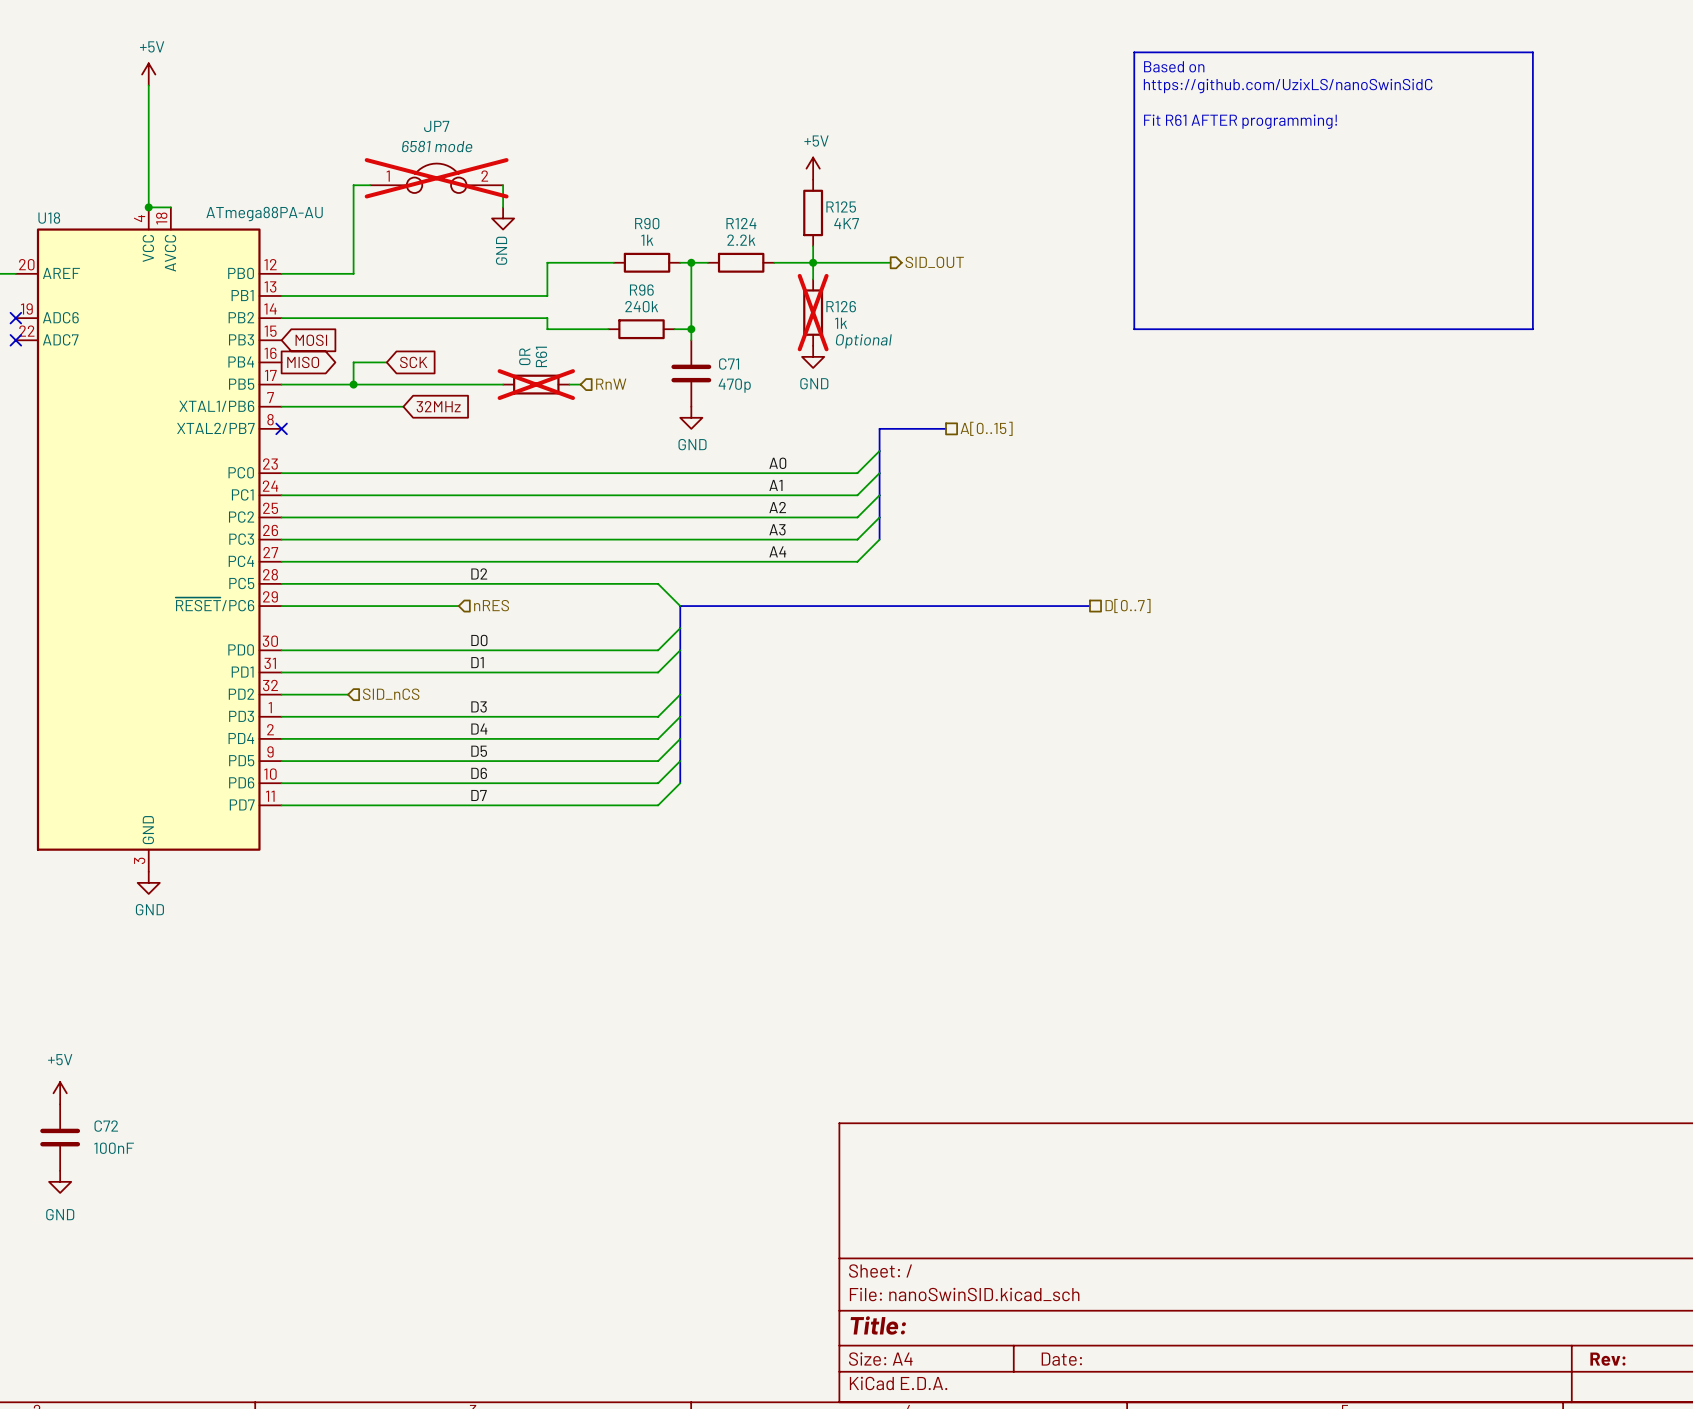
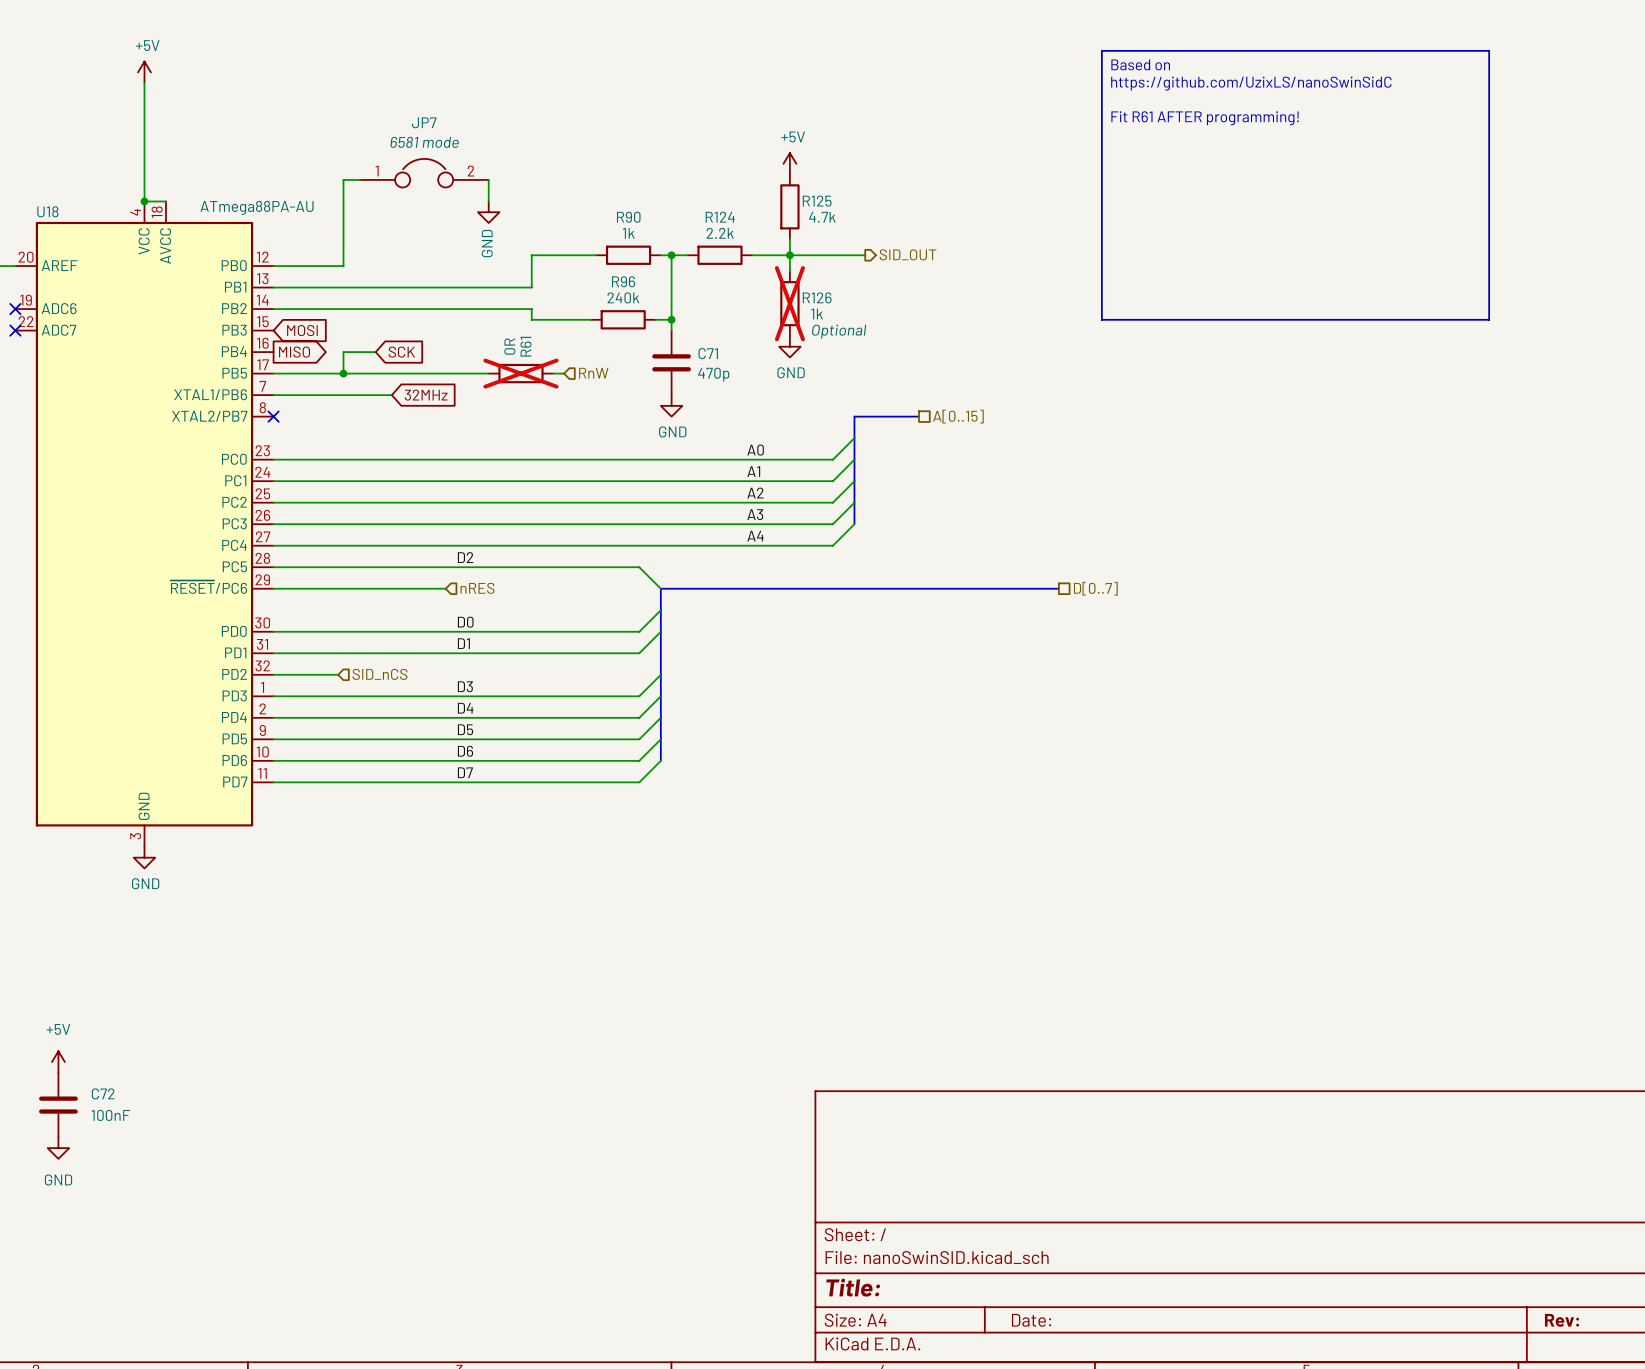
JP7 do-not-place cross: (436, 178) -> none
R125 value: 4K7 (846, 223) -> 4.7k (822, 217)

